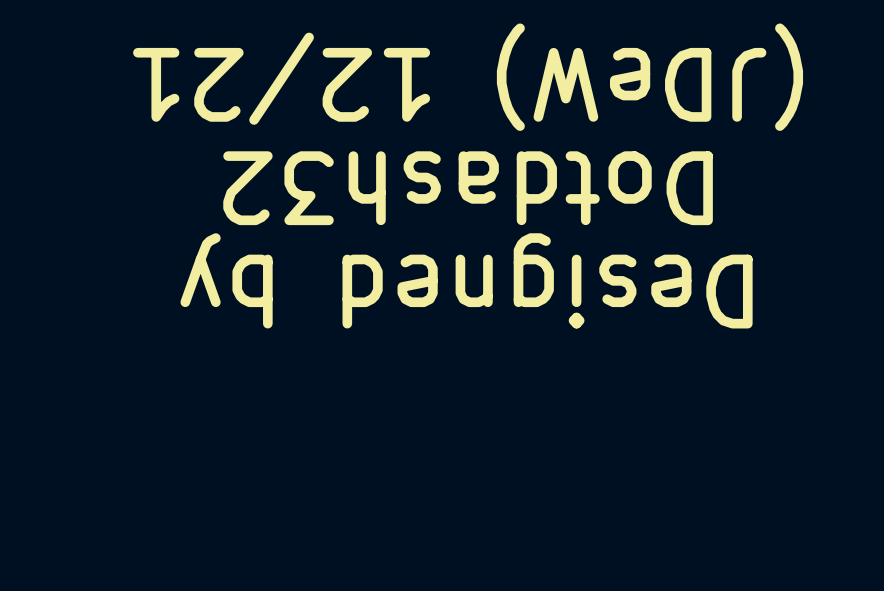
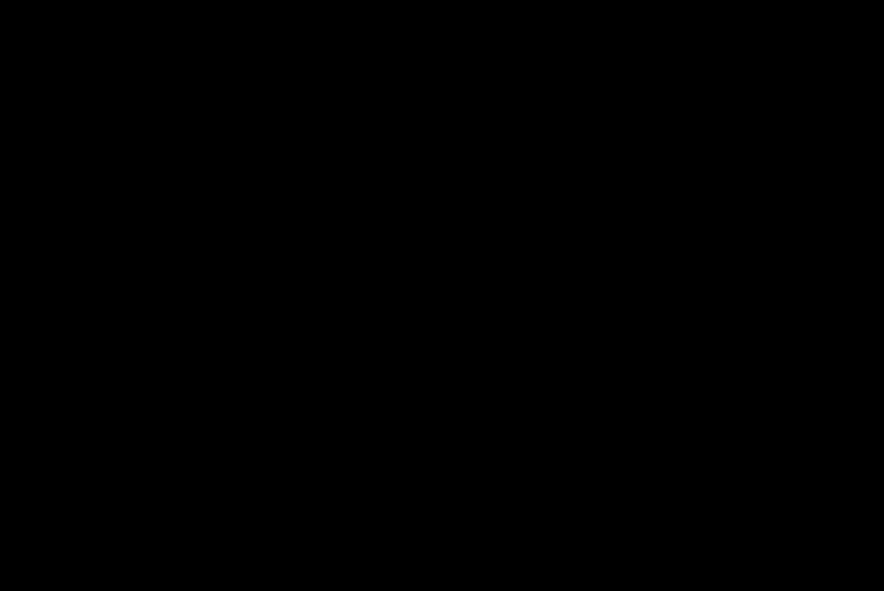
text: (JDeW) 12/21 (468, 77) -> none
text: Dotdash32 (468, 188) -> none
text: Designed by (466, 280) -> none

